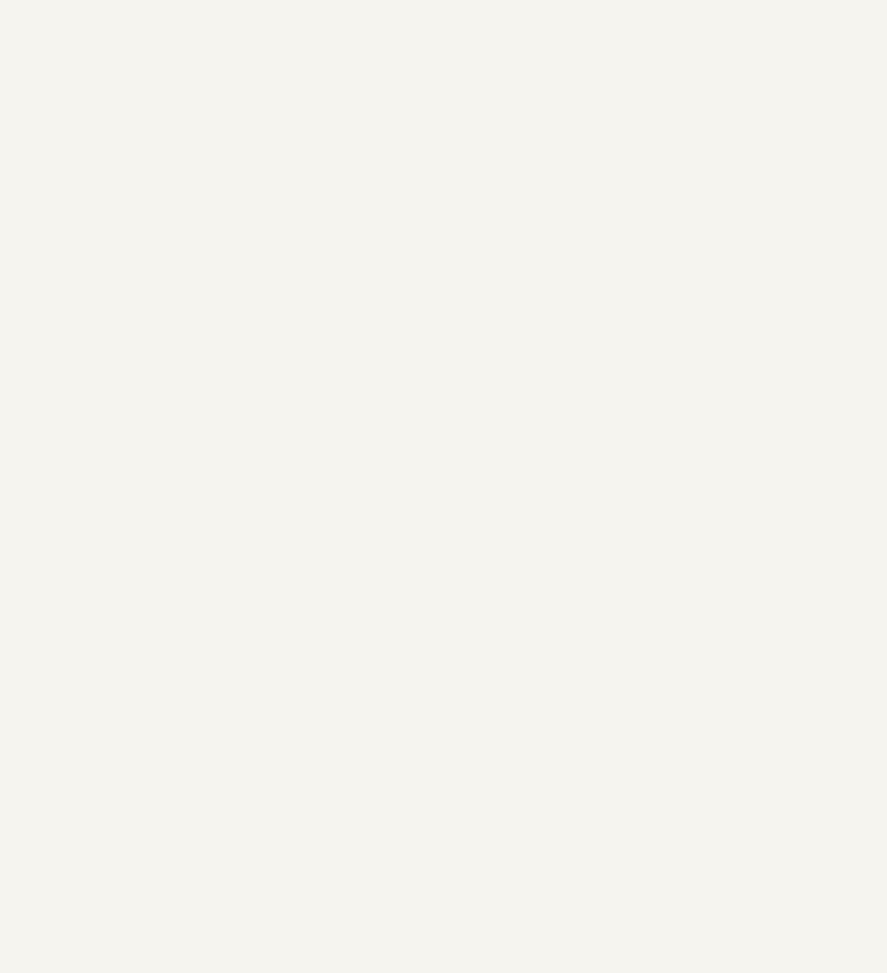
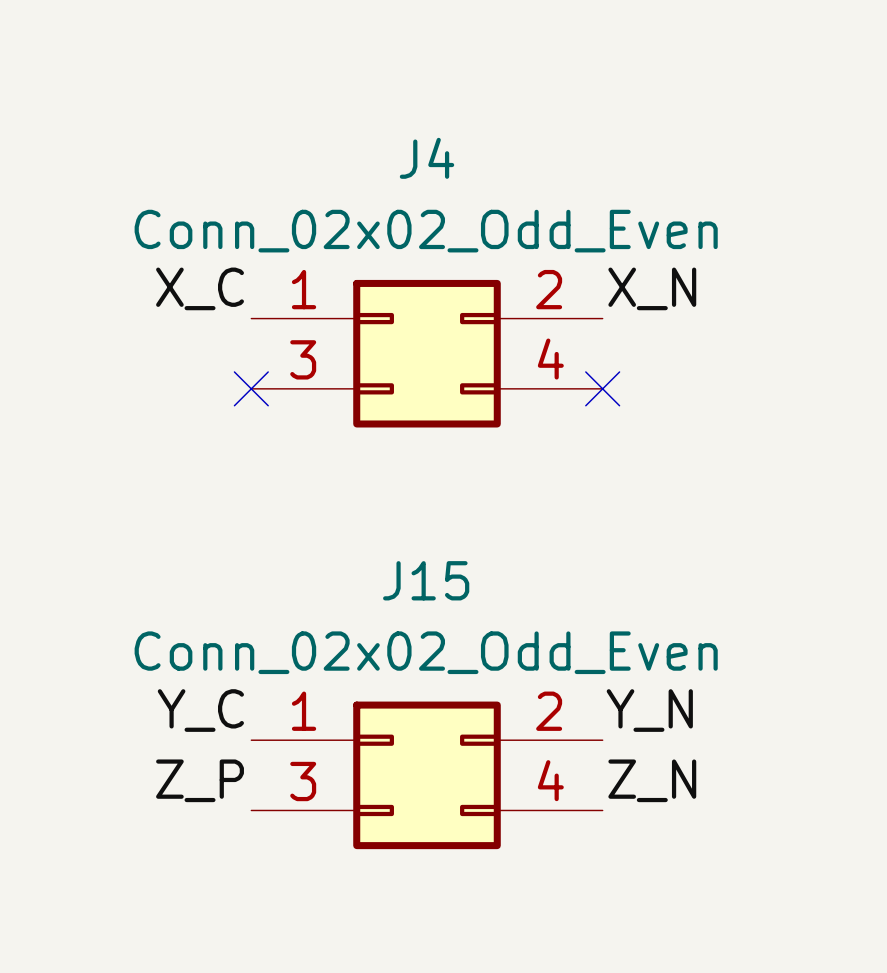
label: none -> X_C (200, 288)
label: none -> X_N (652, 288)
J4: none -> Conn_02x02_Odd_Even (427, 353)
no-connect mark: none -> (251, 388)
no-connect mark: none -> (602, 388)
label: none -> Y_C (200, 710)
label: none -> Y_N (649, 710)
J15: none -> Conn_02x02_Odd_Even (427, 775)
label: none -> Z_P (200, 780)
label: none -> Z_N (652, 780)

